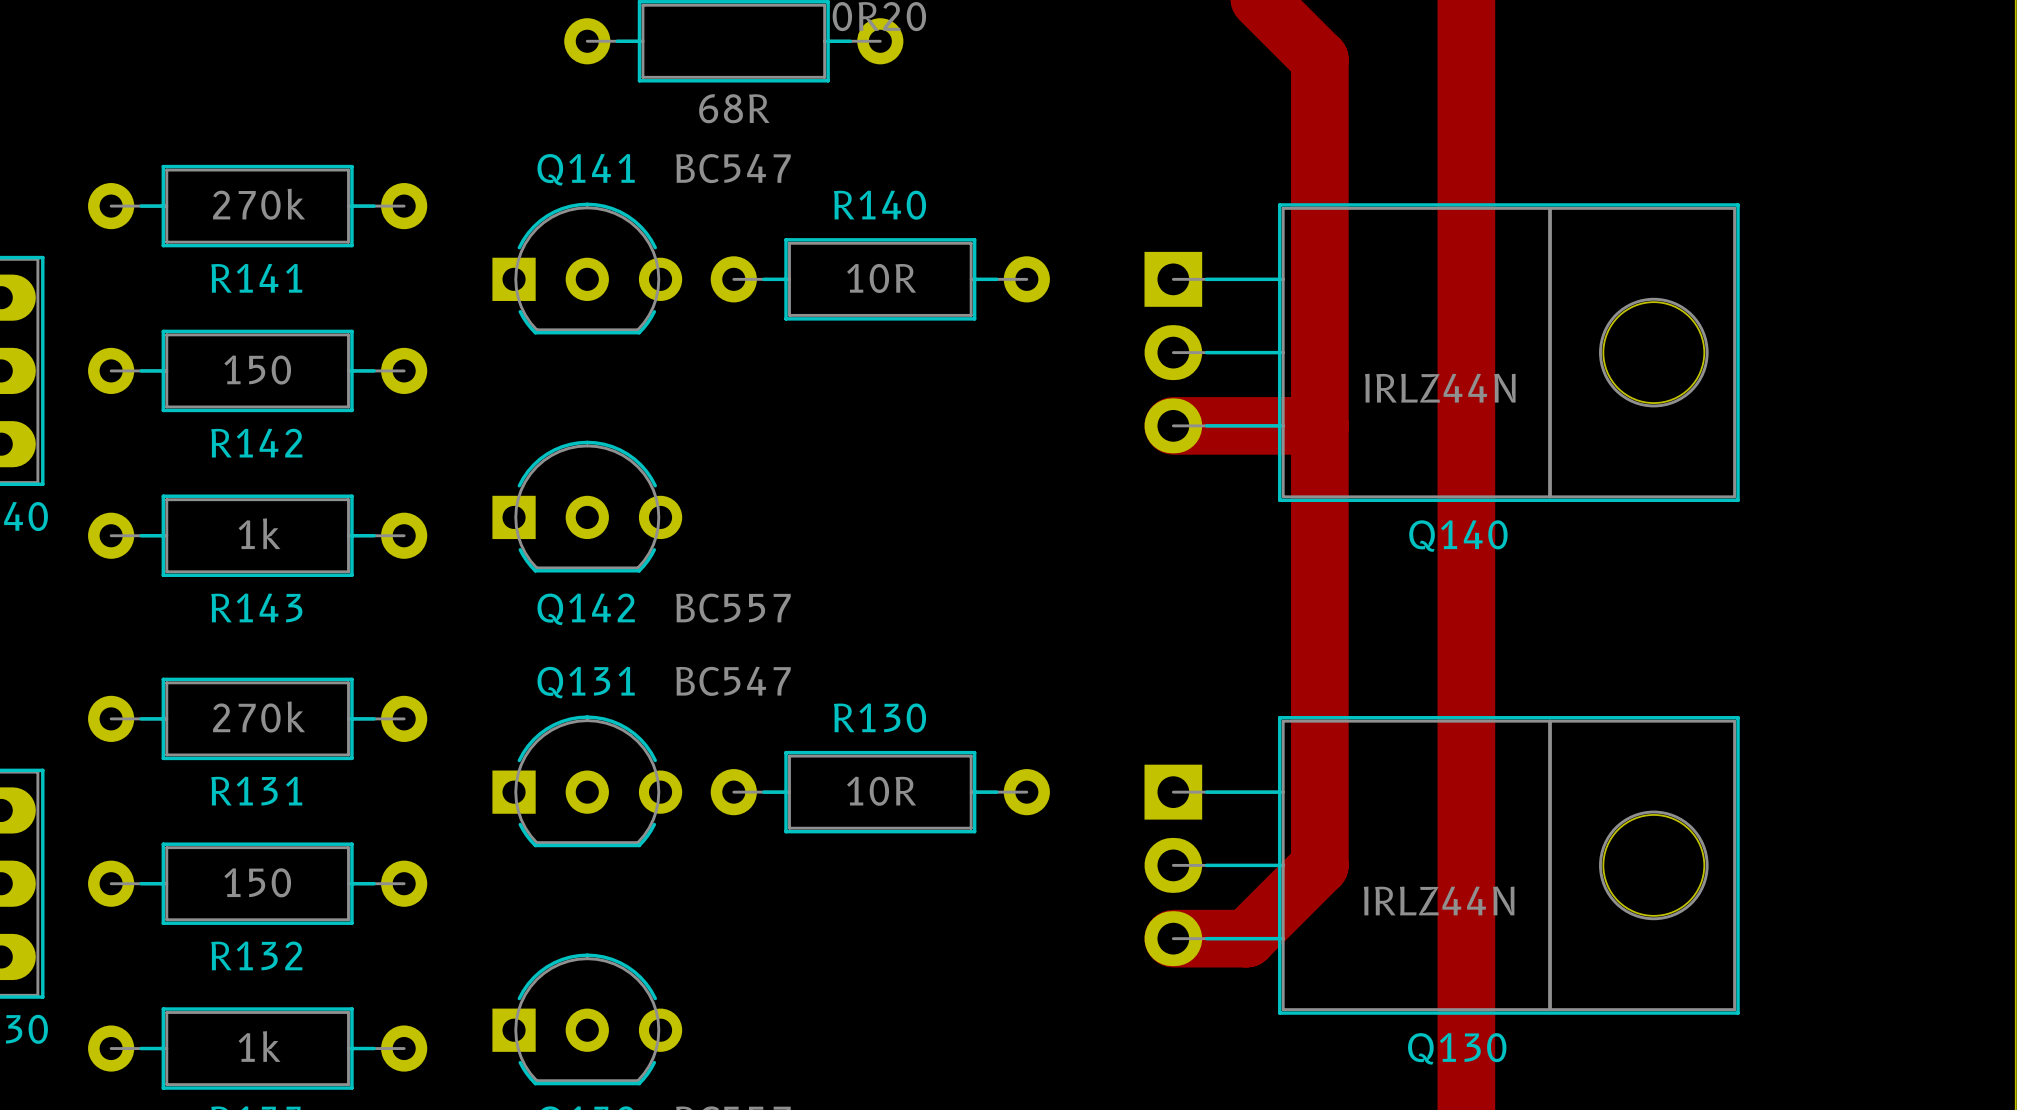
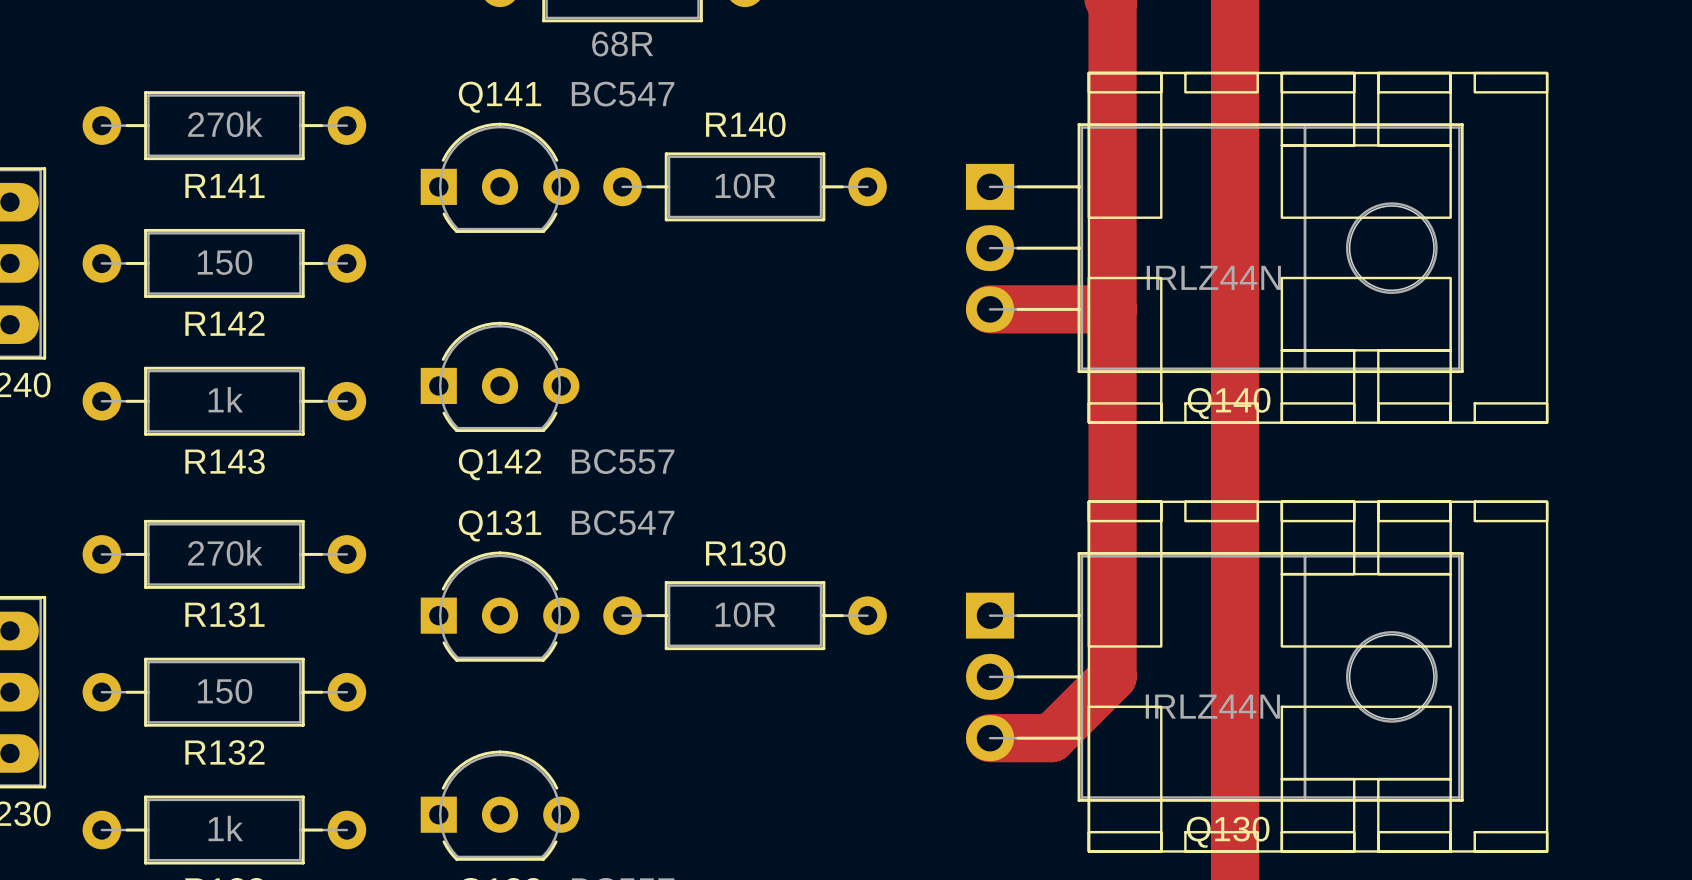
drawing: none -> [1087, 71, 1549, 424]
drawing: none -> [1087, 500, 1549, 853]

